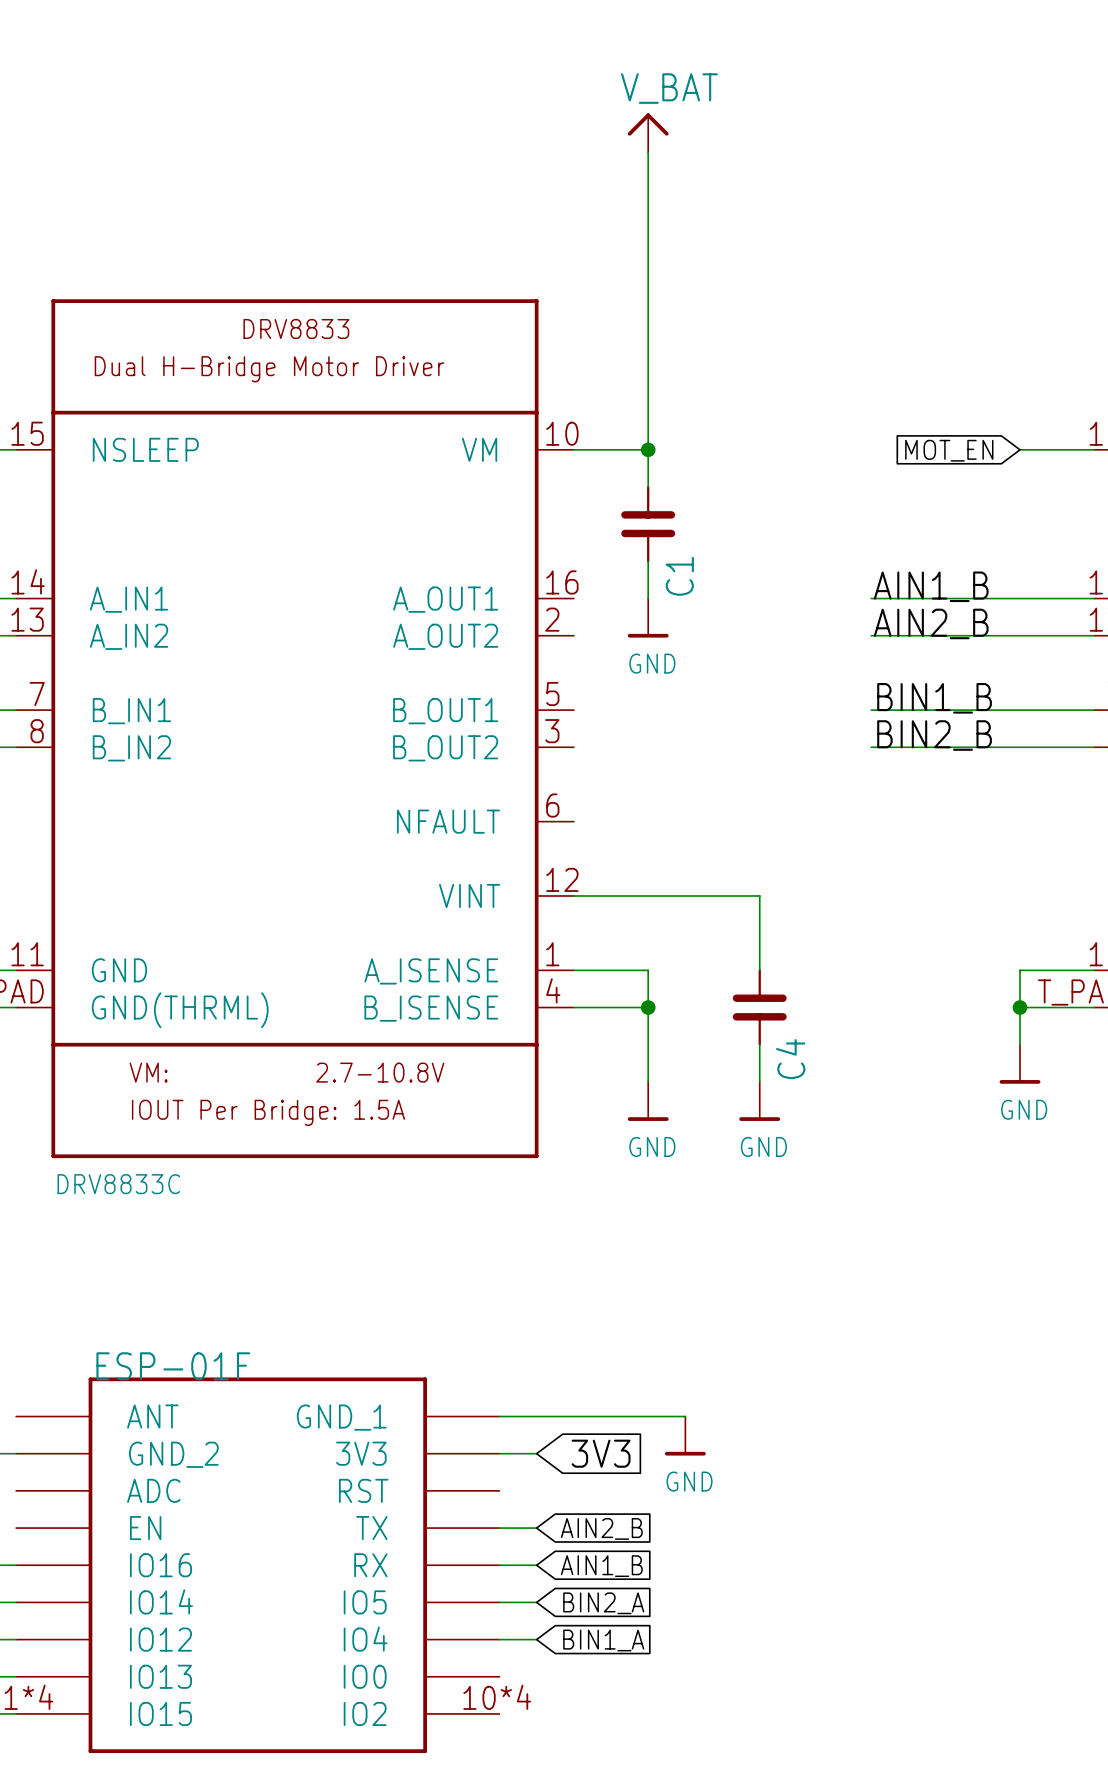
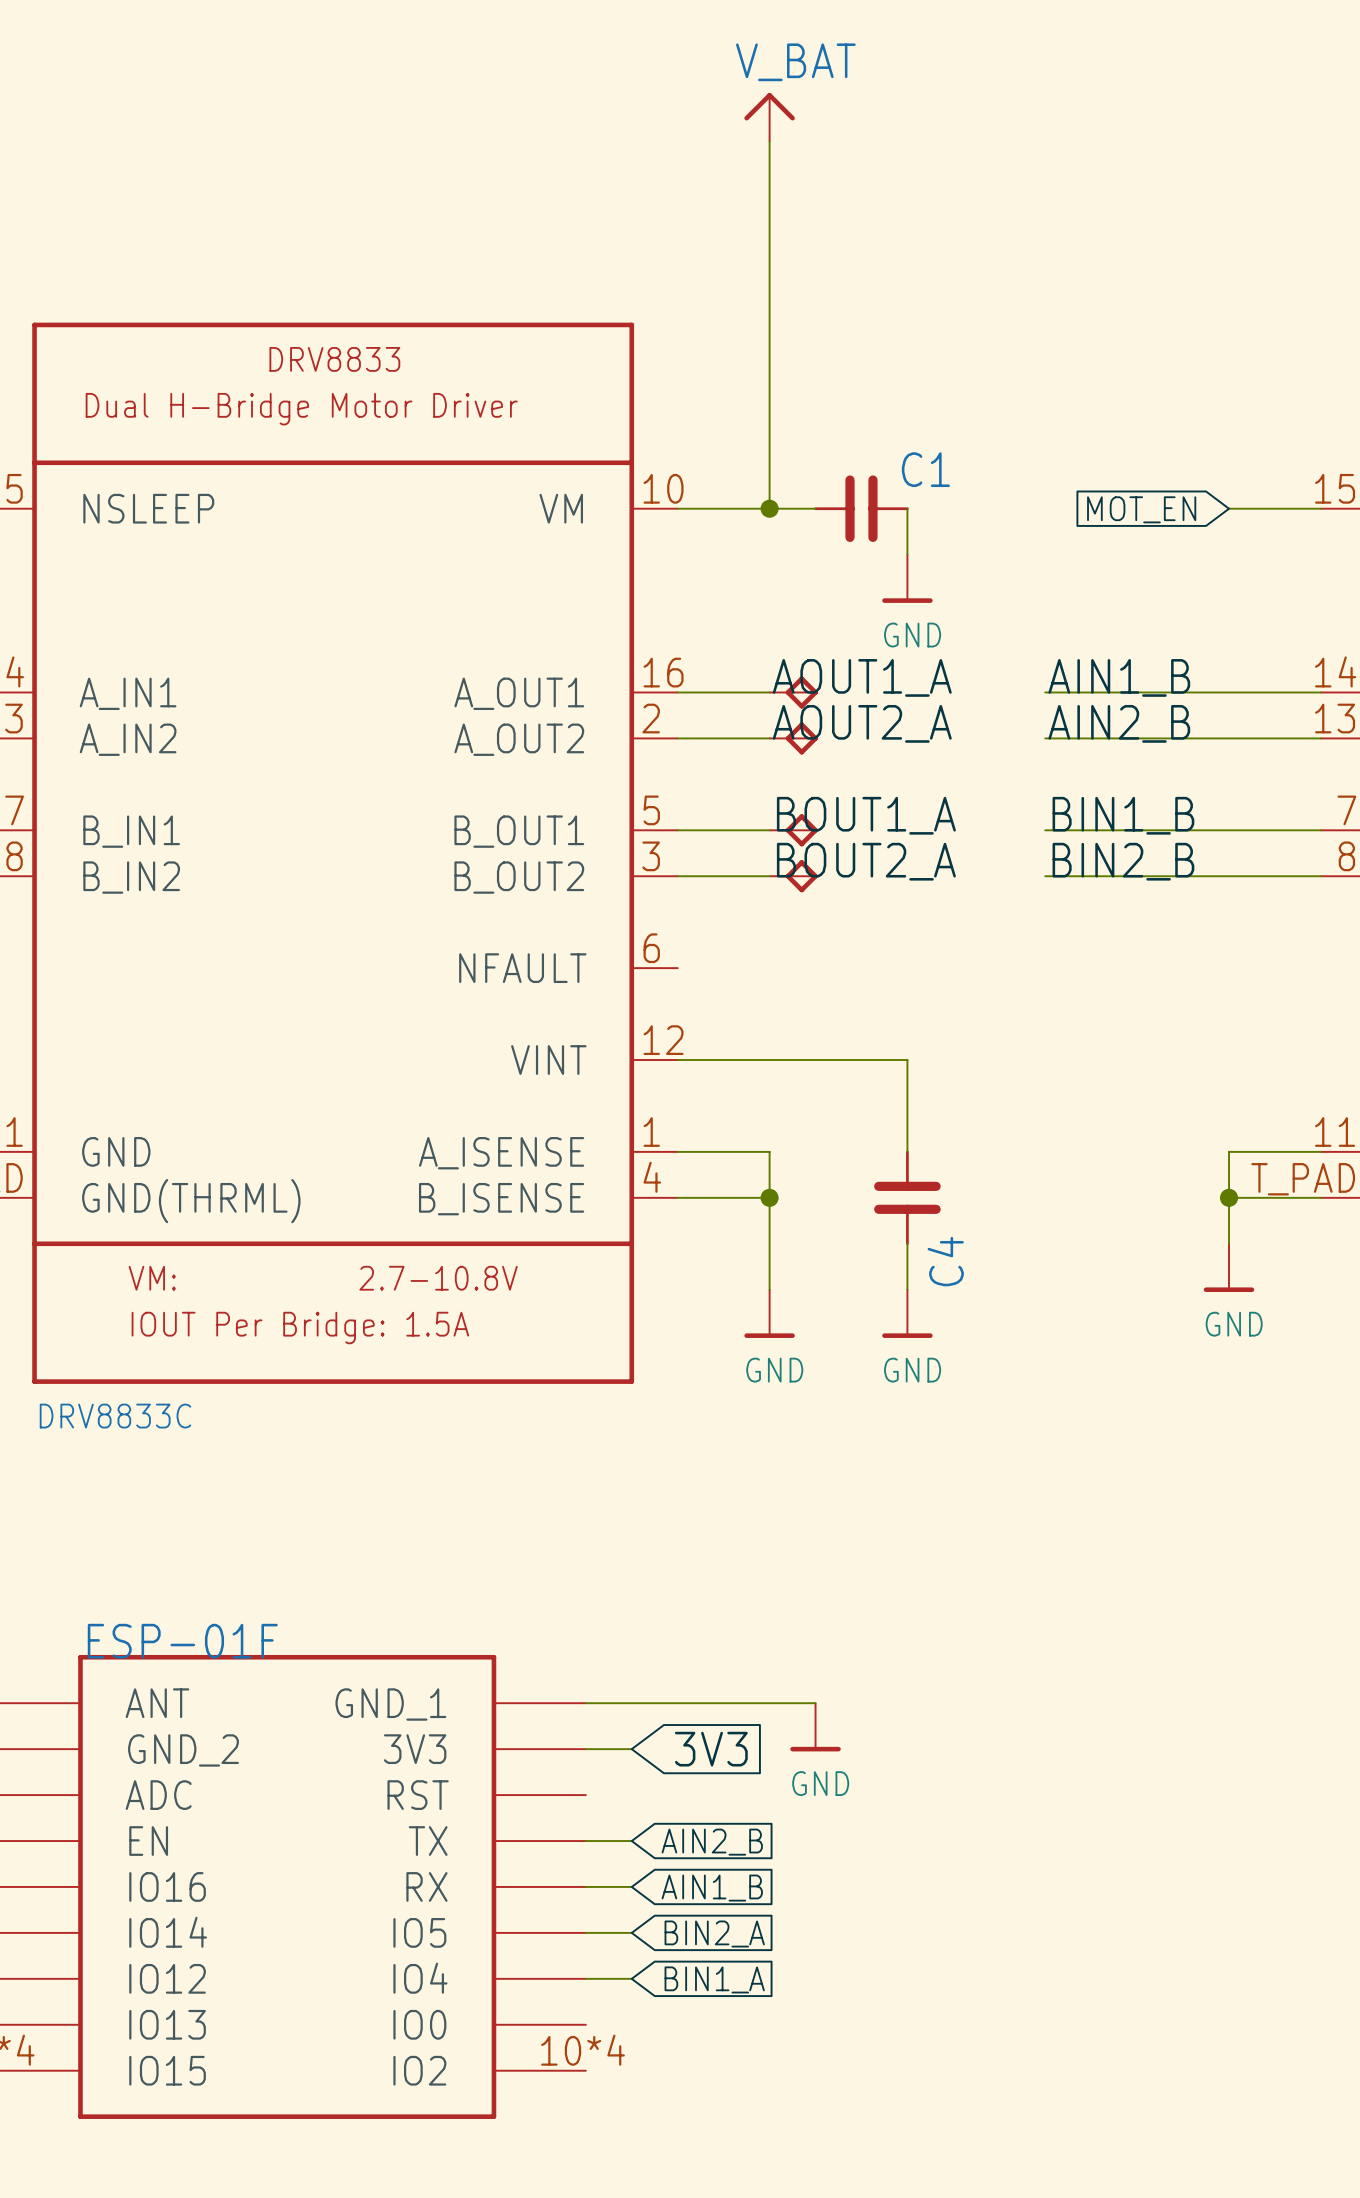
wire: (648, 449) (648, 487) -> (769, 508) (815, 508)
wire: none -> (907, 508) (907, 554)
C1 rotation: 0° (648, 524) -> 90° clockwise (861, 508)
C1 position: (648, 524) -> (861, 508)
wire: (648, 561) (648, 598) -> (677, 692) (769, 692)
C1 name position: C1 (679, 576) -> C1 (925, 469)
label: none -> AOUT1_A (862, 677)
part: none -> (793, 692)
power symbol position: GND (648, 618) -> GND (907, 578)
label: none -> AOUT2_A (862, 723)
wire: none -> (677, 738) (769, 738)
part: none -> (793, 738)
label: none -> BOUT1_A (866, 815)
wire: none -> (677, 830) (769, 830)
part: none -> (793, 830)
label: none -> BOUT2_A (866, 861)
wire: none -> (677, 876) (769, 876)
part: none -> (793, 876)

